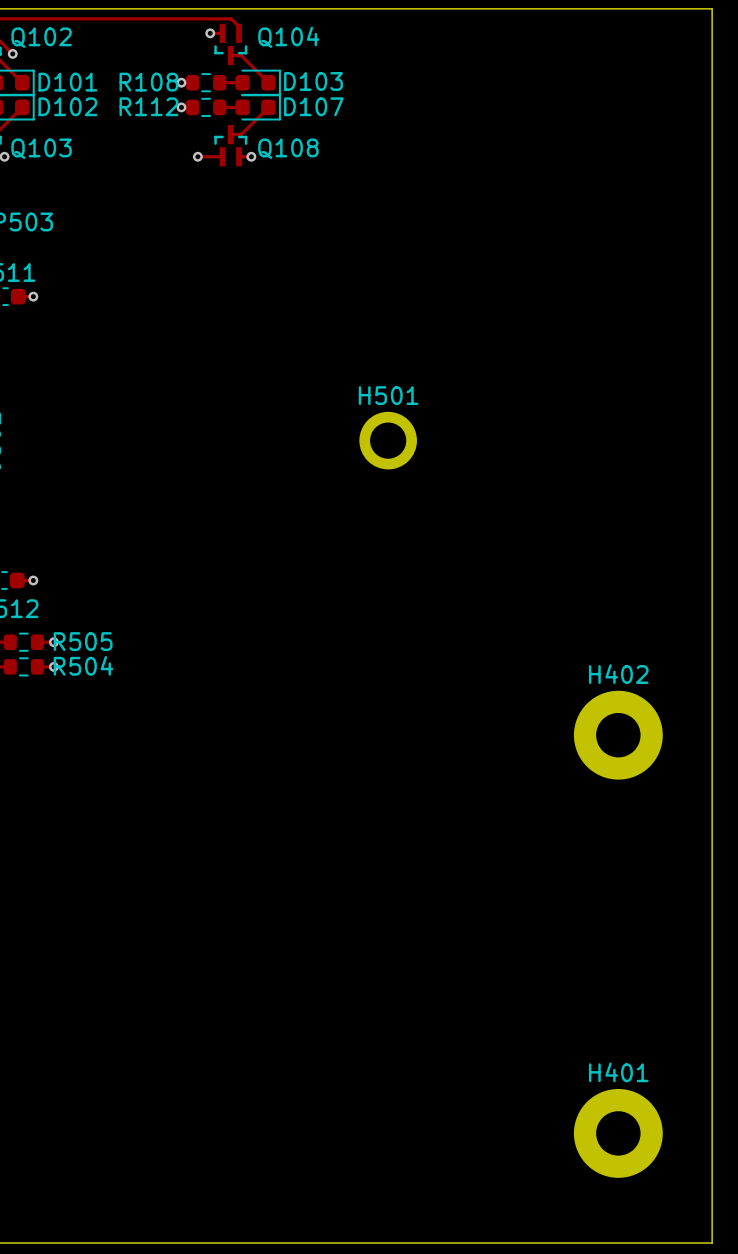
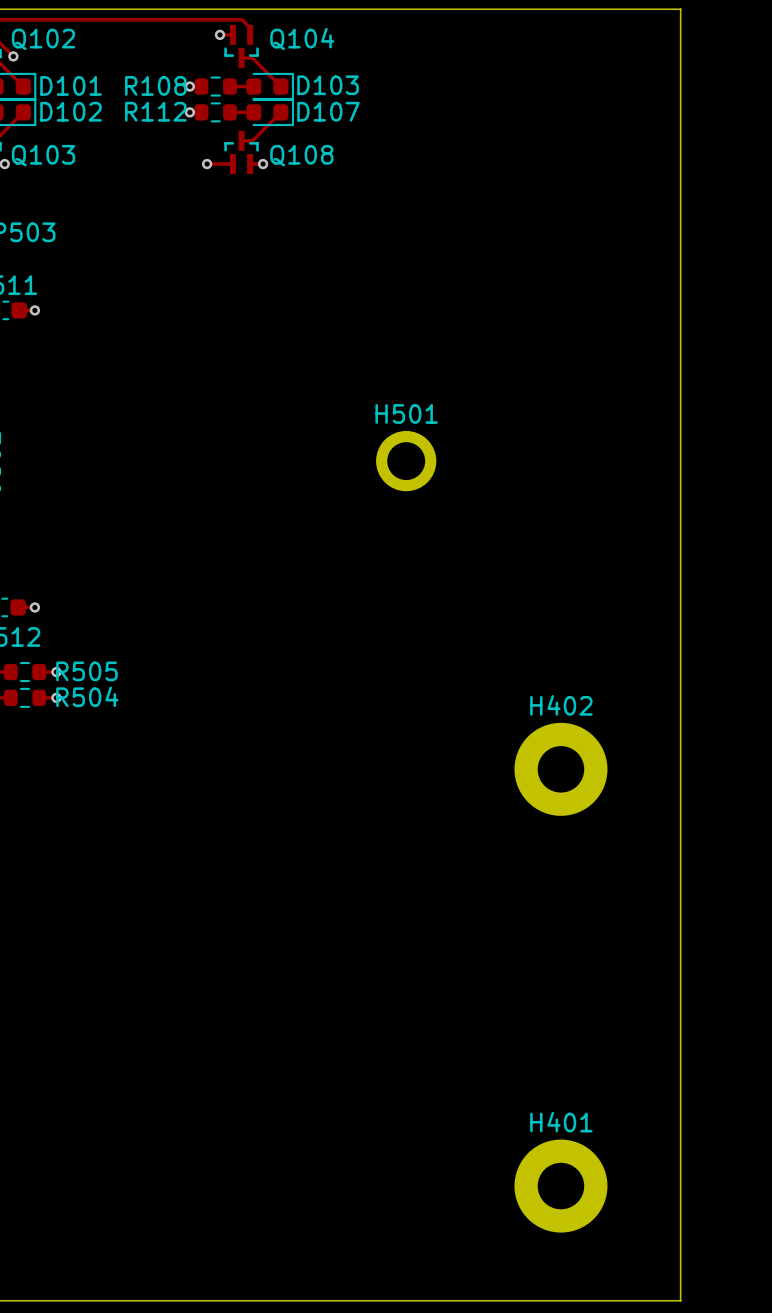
board edge: (650, 8) (712, 8) (712, 1243) (650, 1243) -> (680, 9) (680, 1300)
H402 position: (618, 735) -> (560, 769)
H401 position: (618, 1133) -> (560, 1186)

